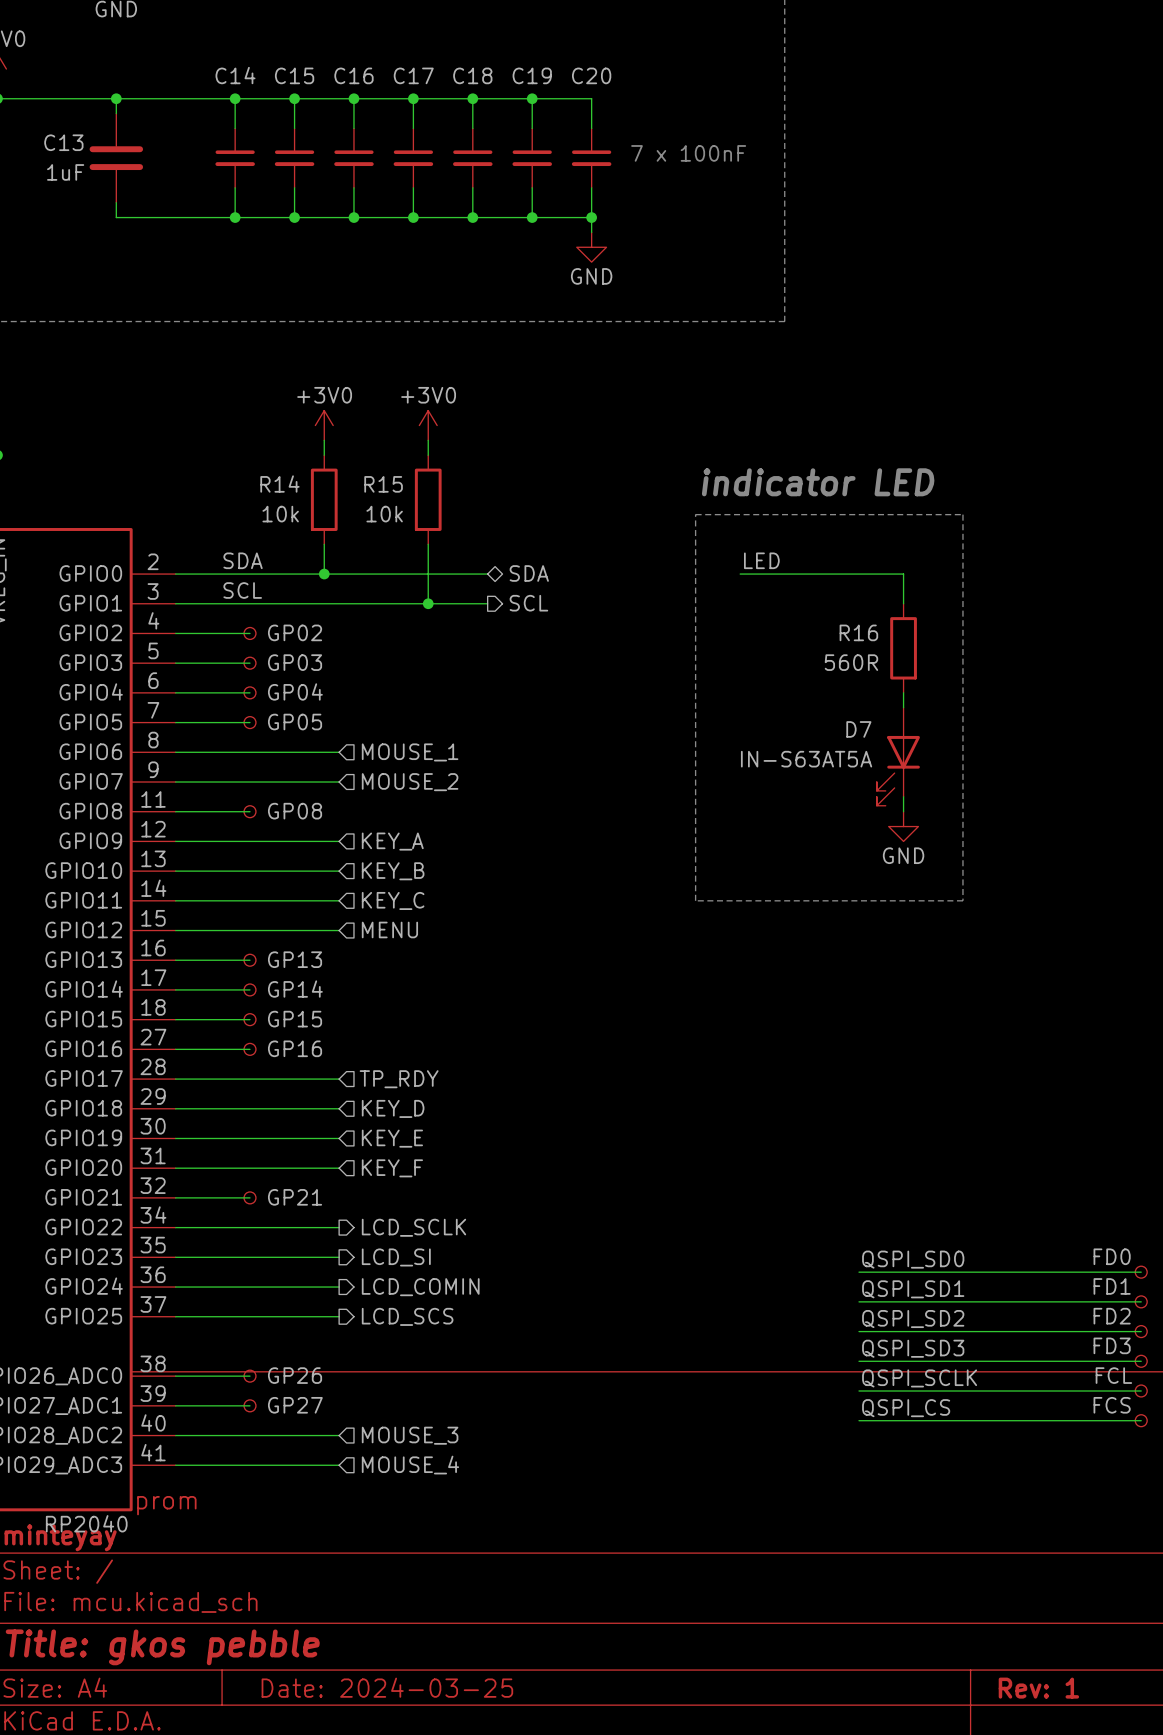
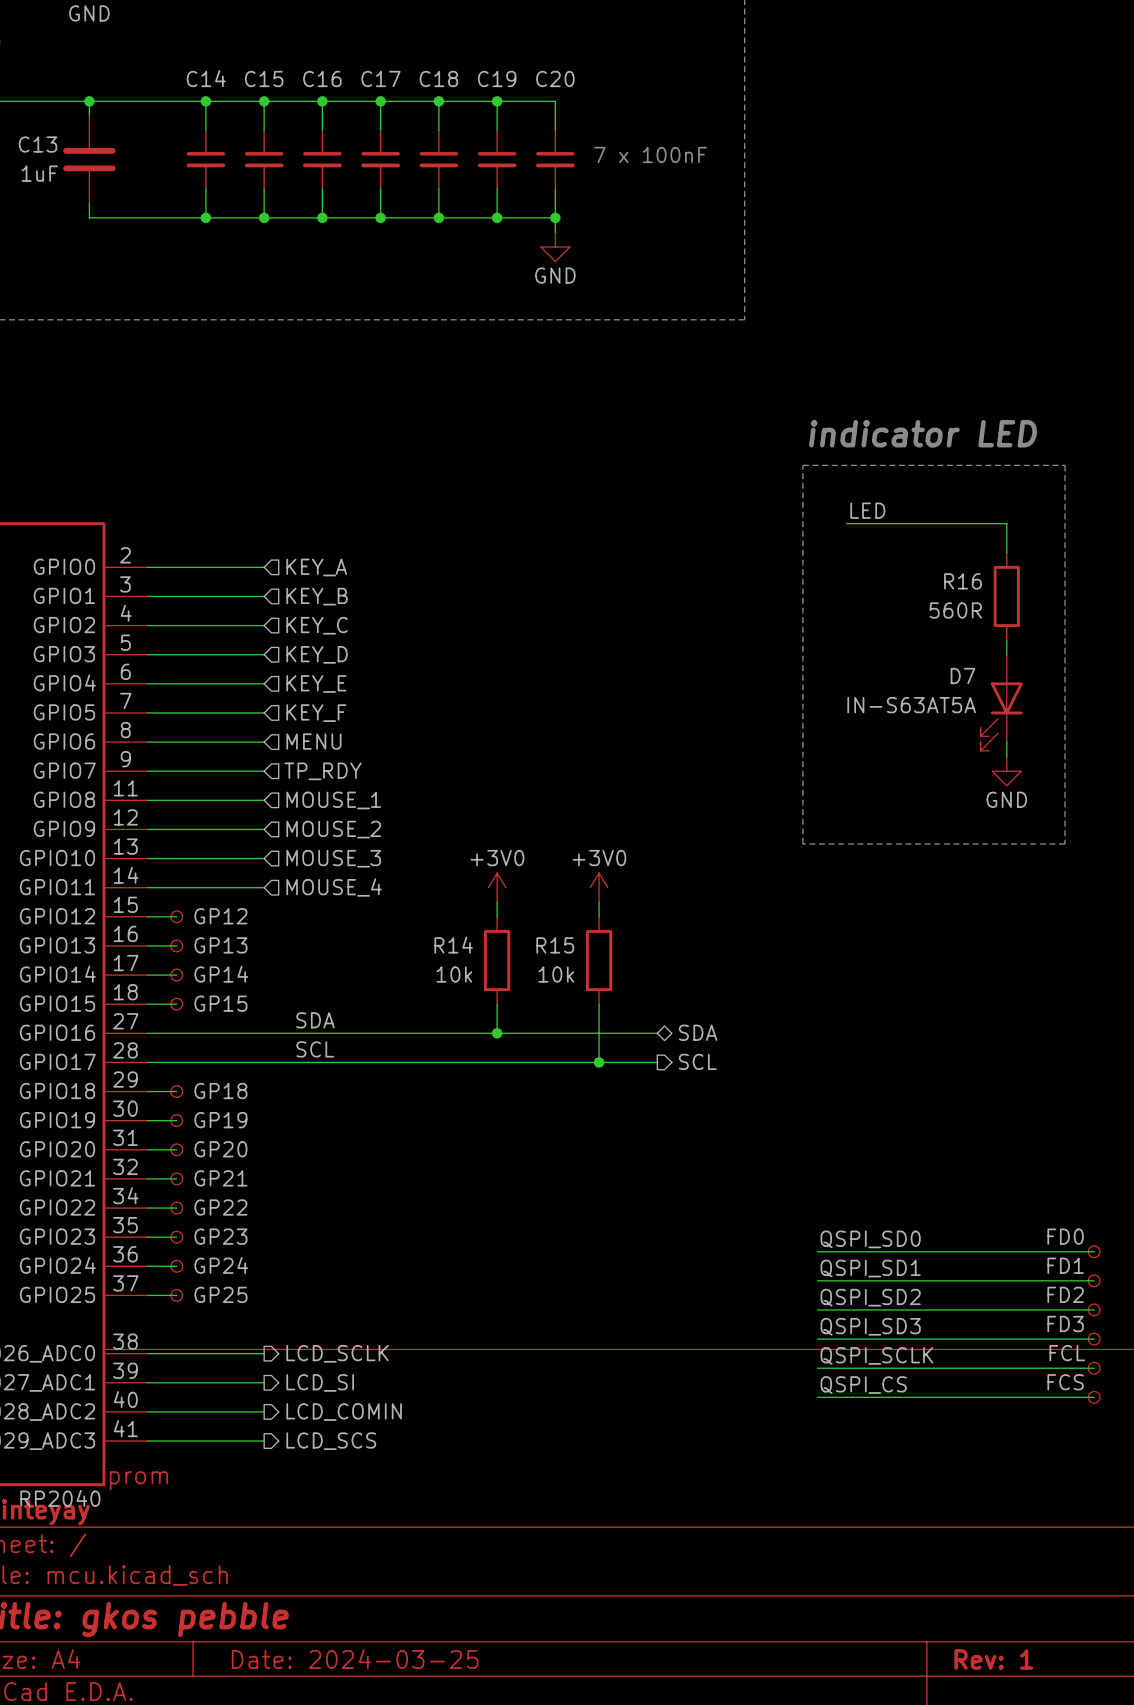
power symbol: +3V0 (324, 425) -> none
power symbol: +3V0 (428, 425) -> none
wire: (324, 440) (324, 455) -> none
wire: (428, 440) (428, 455) -> none
text position: indicator LED (818, 482) -> indicator LED (923, 433)
R14 position: (324, 499) -> (497, 960)
R15 position: (428, 499) -> (599, 960)
line: (695, 514) (962, 514) (962, 900) (695, 900) (695, 514) -> (802, 465) (1065, 465) (1065, 844) (802, 844) (802, 465)
wire: (324, 544) (324, 574) -> none
wire: (428, 544) (428, 603) -> none
label: SDA (243, 560) -> none
label position: LED (761, 560) -> LED (867, 510)
hierarchical label: SDA (529, 573) -> none
wire: (294, 574) (487, 574) -> none
junction: (324, 574) -> none
wire: (740, 574) (903, 574) (903, 603) -> (846, 523) (1006, 523) (1006, 552)
label: SCL (242, 590) -> none
wire: (294, 603) (487, 603) -> none
junction: (428, 603) -> none
hierarchical label: SCL (528, 603) -> none
part: GP02 (250, 633) -> none
R16 position: (903, 648) -> (1006, 596)
part: GP03 (250, 663) -> none
hierarchical label: none -> KEY_D (317, 654)
part: GP04 (250, 692) -> none
wire: (903, 692) (903, 707) -> (1006, 640) (1006, 654)
hierarchical label: none -> KEY_E (316, 683)
part: GP05 (250, 722) -> none
hierarchical label: none -> KEY_F (316, 713)
wire: (294, 752) (339, 752) -> (220, 683) (264, 683)
hierarchical label position: MOUSE_1 (410, 752) -> MOUSE_1 (333, 800)
D7 position: (898, 756) -> (1001, 702)
wire: (294, 782) (339, 782) -> (220, 712) (264, 712)
hierarchical label: none -> TP_RDY (322, 771)
hierarchical label position: MOUSE_2 (410, 782) -> MOUSE_2 (333, 829)
wire: (903, 796) (903, 811) -> (1006, 742) (1006, 756)
part: GP08 (250, 811) -> none
power symbol position: GND (903, 826) -> GND (1006, 771)
wire: (294, 841) (339, 841) -> (220, 654) (264, 654)
hierarchical label position: KEY_A (392, 841) -> KEY_A (316, 567)
wire: (294, 871) (339, 871) -> (220, 800) (264, 800)
hierarchical label: none -> MOUSE_3 (333, 858)
hierarchical label position: KEY_B (393, 871) -> KEY_B (317, 596)
wire: (294, 900) (339, 900) -> (220, 625) (264, 625)
hierarchical label: none -> MOUSE_4 (334, 887)
hierarchical label position: KEY_C (393, 900) -> KEY_C (317, 625)
power symbol: none -> +3V0 (497, 887)
power symbol: none -> +3V0 (599, 887)
wire: none -> (497, 902) (497, 916)
wire: none -> (599, 902) (599, 916)
hierarchical label position: MENU (389, 929) -> MENU (313, 741)
wire: (205, 930) (339, 930) -> none
part: none -> GP12 (176, 916)
wire: (205, 960) (250, 960) -> none
part position: (250, 960) -> (176, 945)
wire: (205, 989) (250, 989) -> none
part position: (250, 989) -> (176, 975)
wire: (205, 1019) (250, 1019) -> none
part position: (250, 1019) -> (176, 1004)
wire: none -> (497, 1004) (497, 1033)
wire: none -> (599, 1004) (599, 1062)
label: none -> SDA (315, 1020)
hierarchical label: none -> SDA (698, 1032)
wire: none -> (220, 1033) (657, 1033)
part: GP16 (250, 1049) -> none
junction: none -> (497, 1033)
label: none -> SCL (315, 1049)
hierarchical label: none -> SCL (697, 1061)
wire: none -> (307, 1062) (657, 1062)
hierarchical label: TP_RDY (399, 1079) -> none
junction: none -> (599, 1062)
wire: (205, 1108) (339, 1108) -> none
part: none -> GP18 (176, 1091)
hierarchical label: KEY_D (393, 1108) -> none
wire: (205, 1138) (339, 1138) -> none
part: none -> GP19 (176, 1120)
hierarchical label: KEY_E (392, 1138) -> none
wire: (205, 1168) (339, 1168) -> none
part: none -> GP20 (176, 1149)
hierarchical label: KEY_F (392, 1168) -> none
wire: (205, 1197) (250, 1197) -> none
part position: (250, 1197) -> (176, 1178)
wire: (205, 1227) (339, 1227) -> none
part: none -> GP22 (176, 1208)
hierarchical label position: LCD_SCLK (413, 1227) -> LCD_SCLK (337, 1353)
wire: (205, 1257) (339, 1257) -> none
part: none -> GP23 (176, 1237)
hierarchical label position: LCD_SI (396, 1257) -> LCD_SI (320, 1382)
wire: (205, 1287) (339, 1287) -> none
part: none -> GP24 (176, 1266)
hierarchical label position: LCD_COMIN (420, 1287) -> LCD_COMIN (344, 1412)
wire: (205, 1316) (339, 1316) -> none
part: none -> GP25 (176, 1295)
hierarchical label position: LCD_SCS (407, 1316) -> LCD_SCS (331, 1441)
part: GP26 (250, 1376) -> none
part: GP27 (250, 1405) -> none
wire: (294, 1435) (339, 1435) -> (220, 1353) (264, 1353)
hierarchical label: MOUSE_3 (410, 1435) -> none
wire: (294, 1465) (339, 1465) -> (220, 1382) (264, 1382)
hierarchical label: MOUSE_4 (410, 1465) -> none

